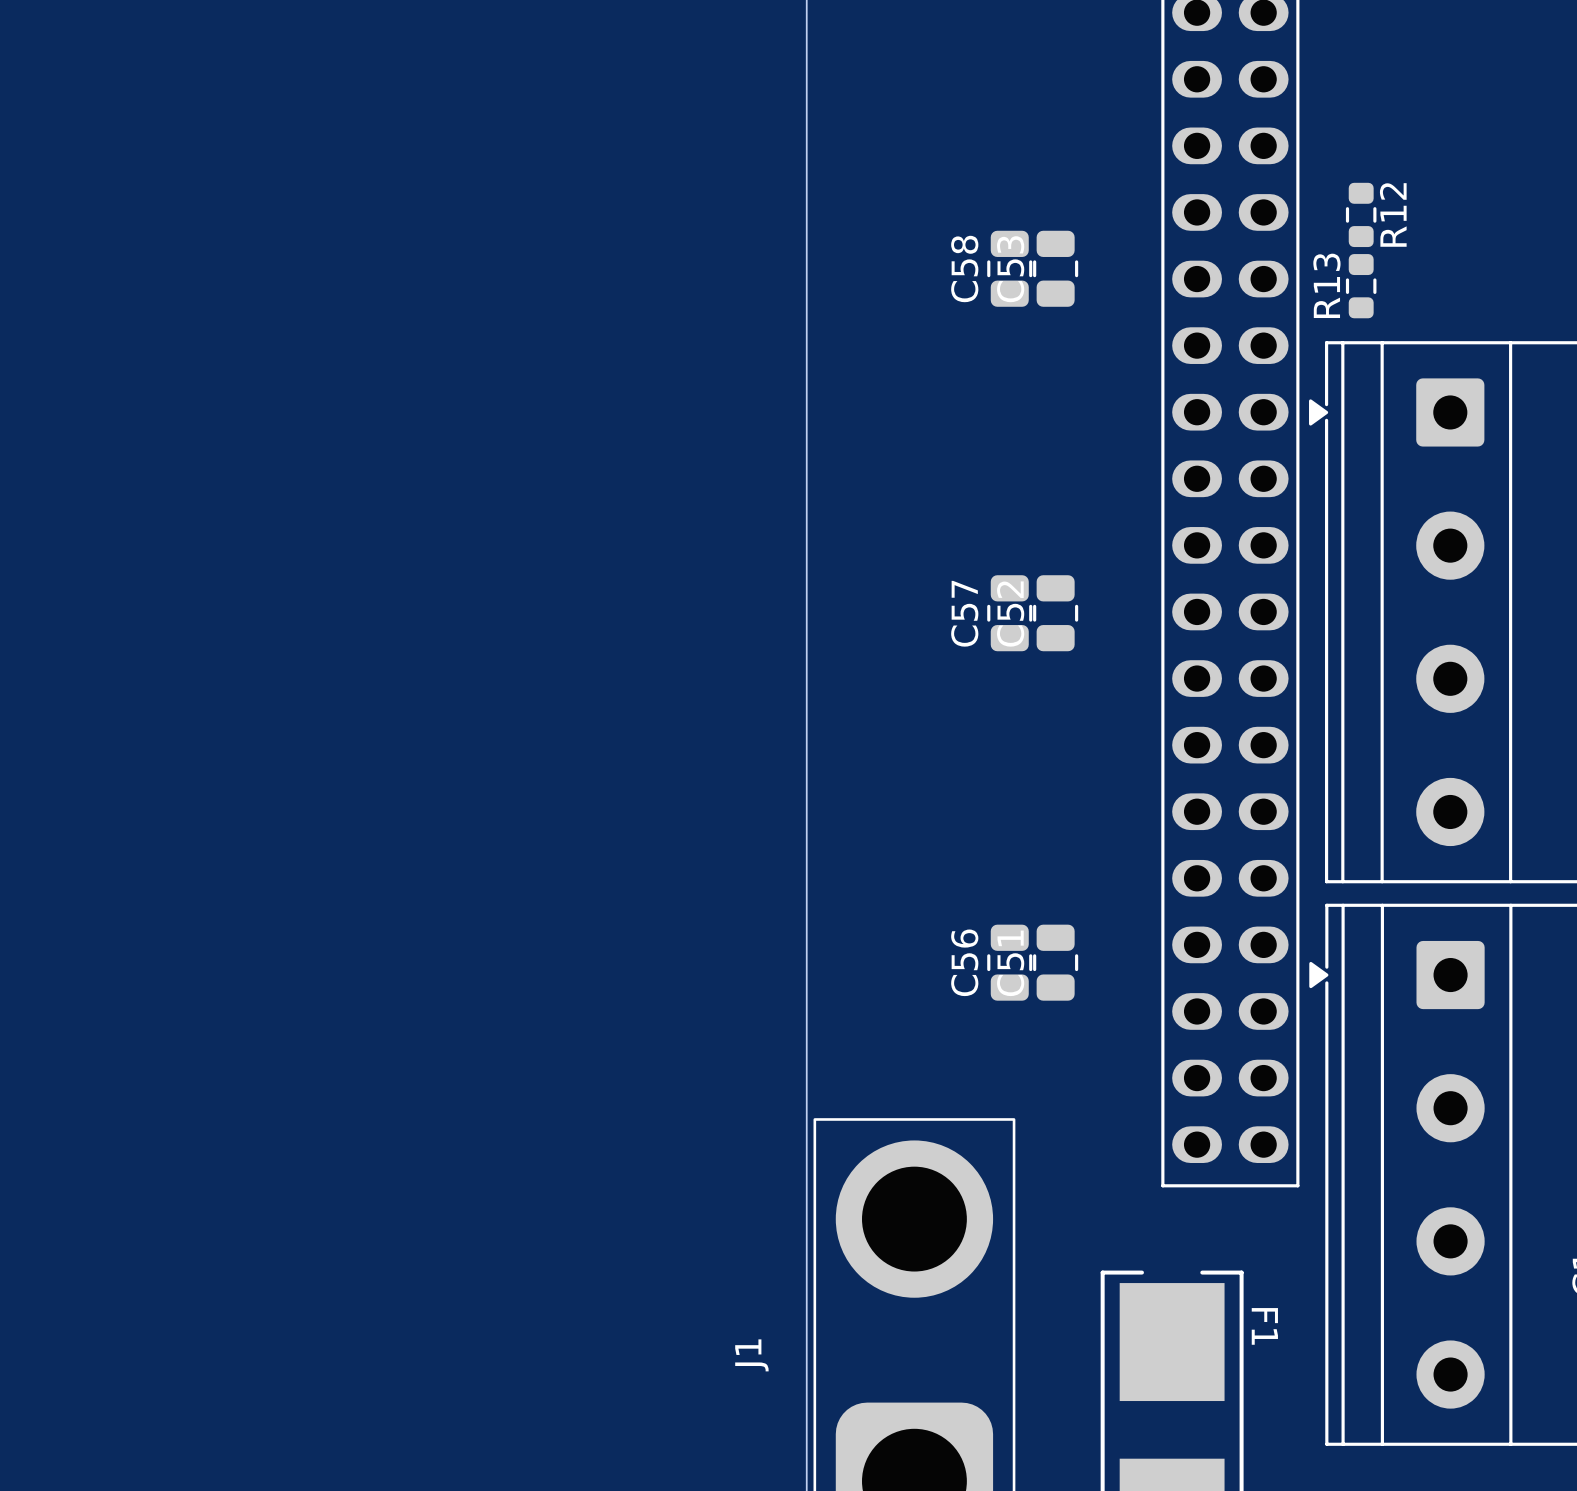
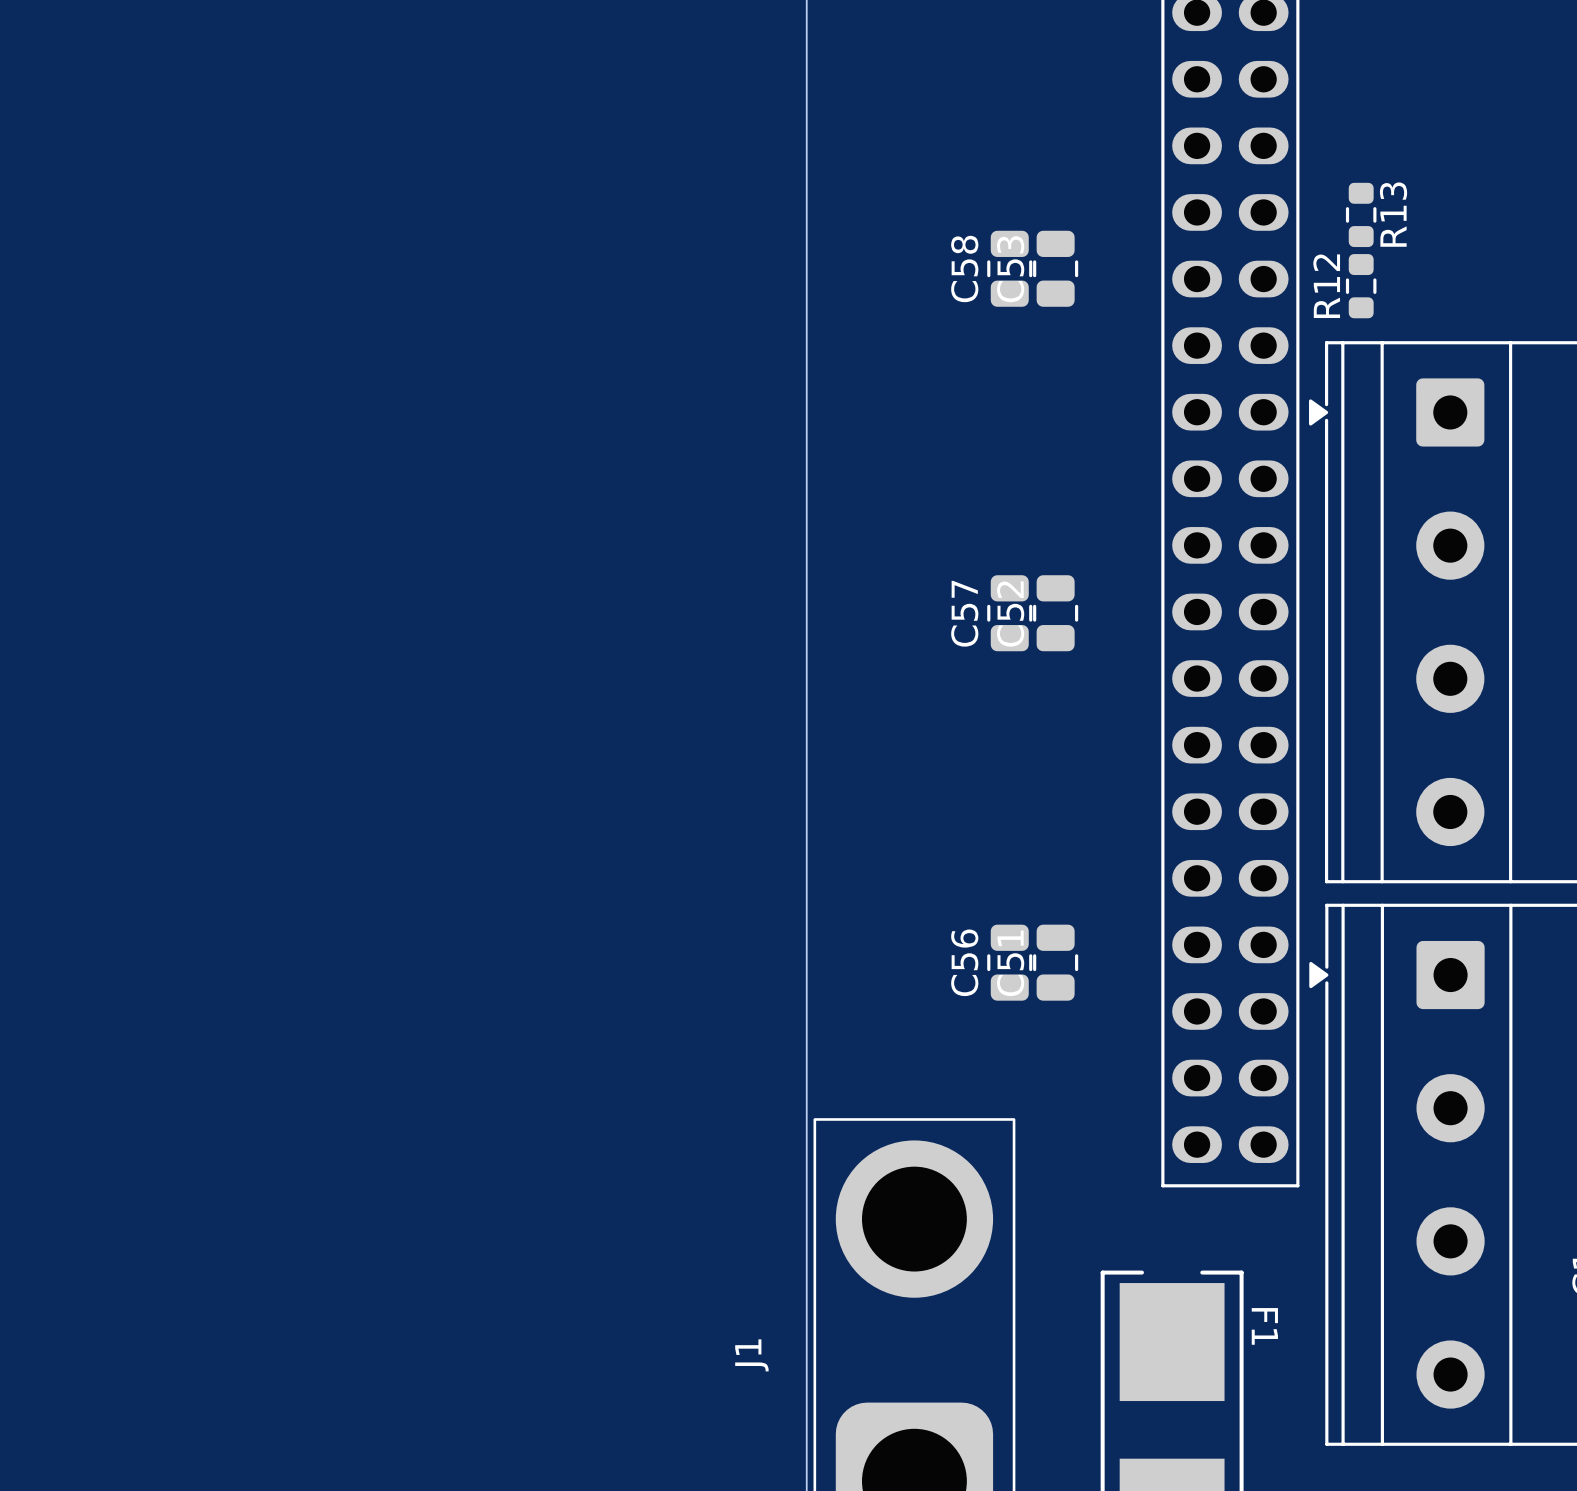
R12 name: R12 (1393, 214) -> R13 (1393, 214)
R13 name: R13 (1326, 285) -> R12 (1326, 286)

